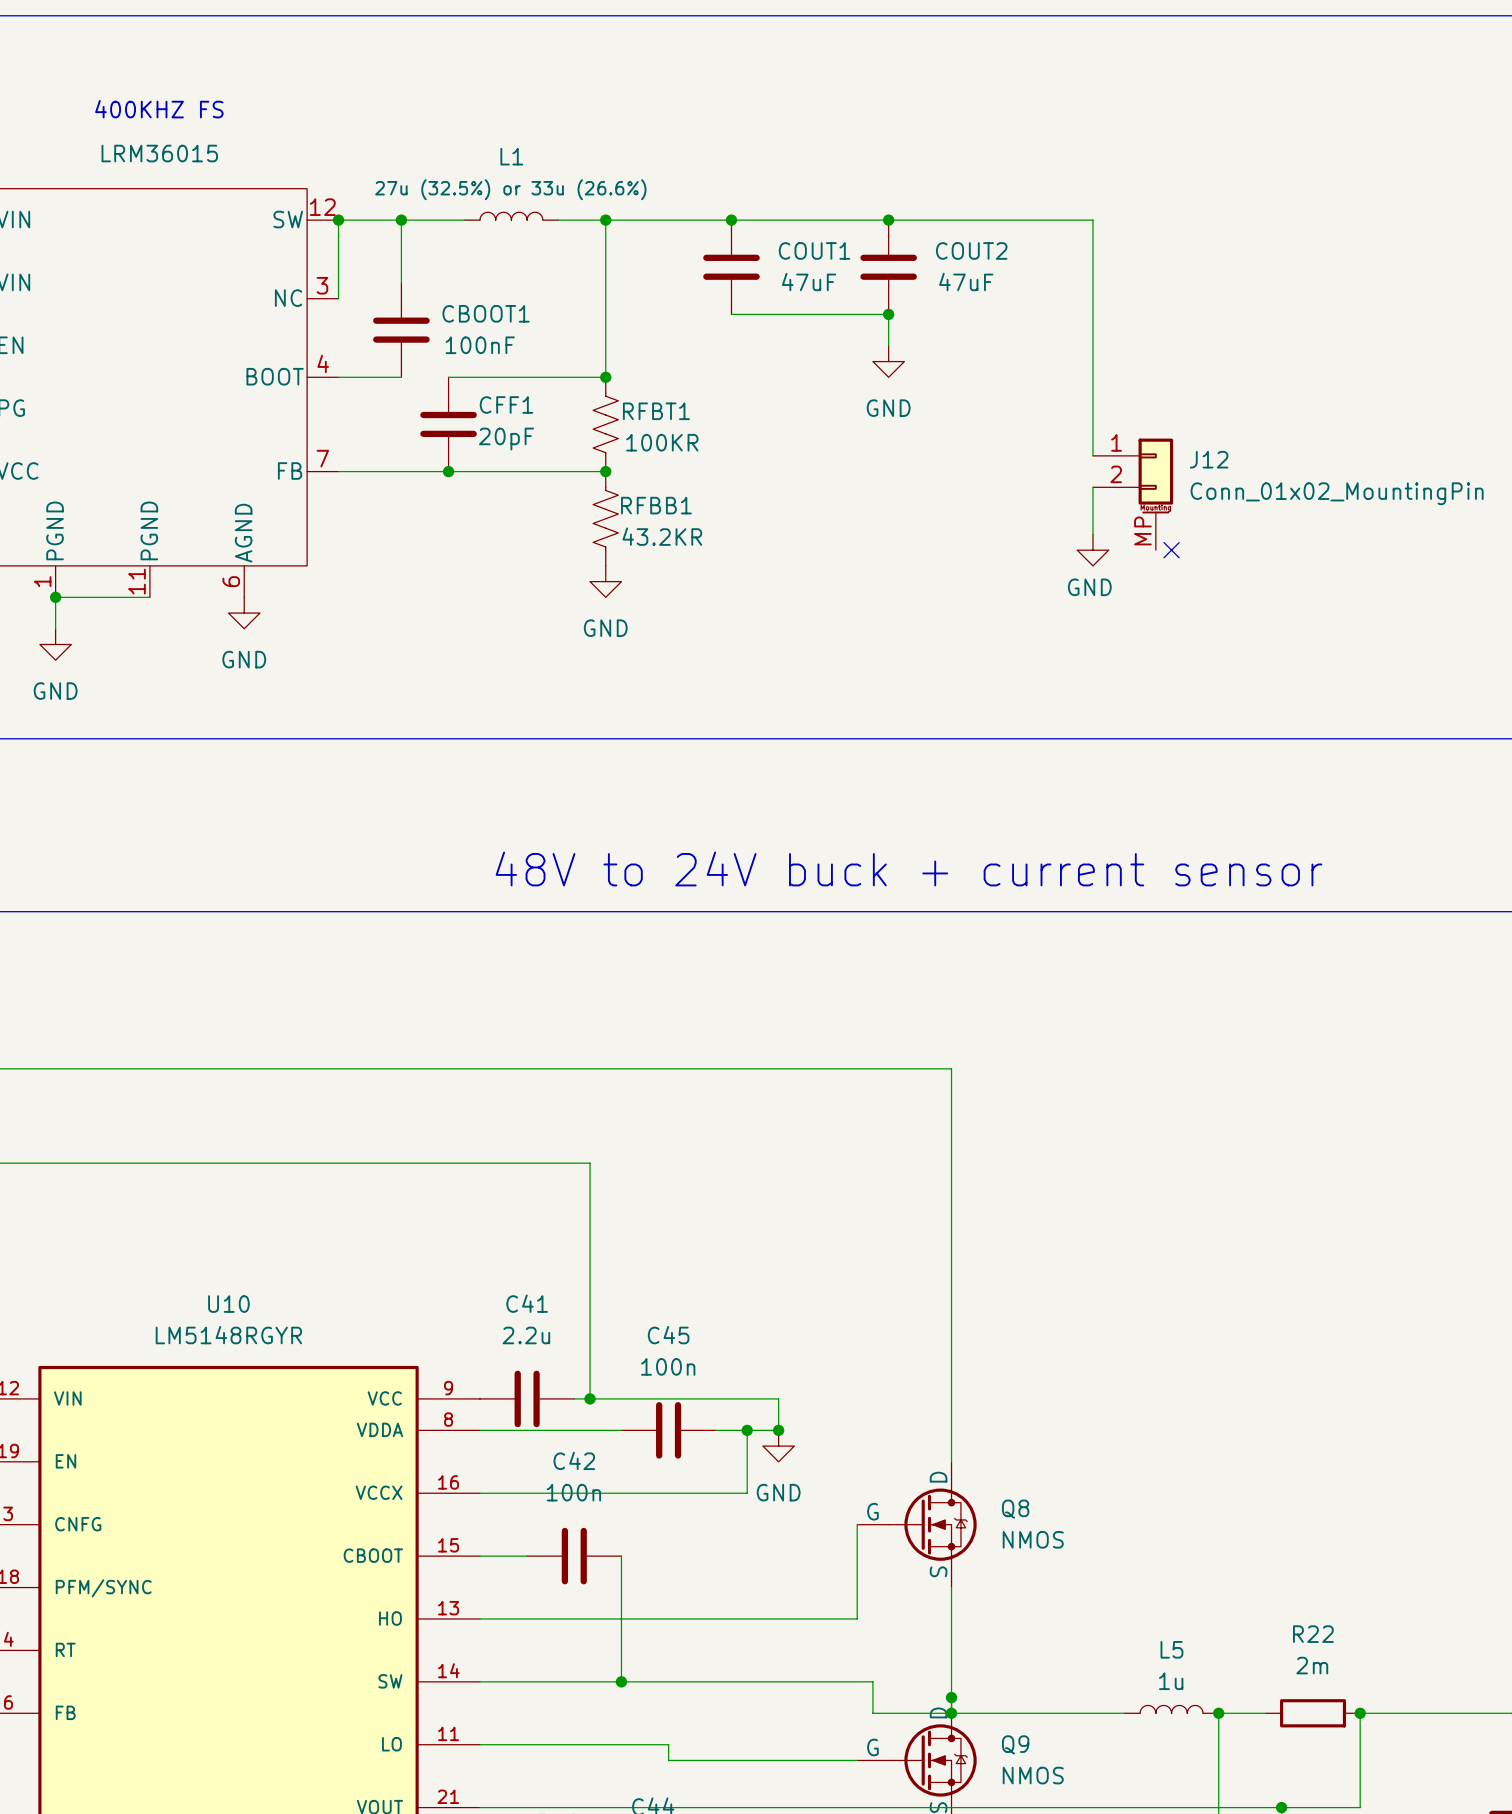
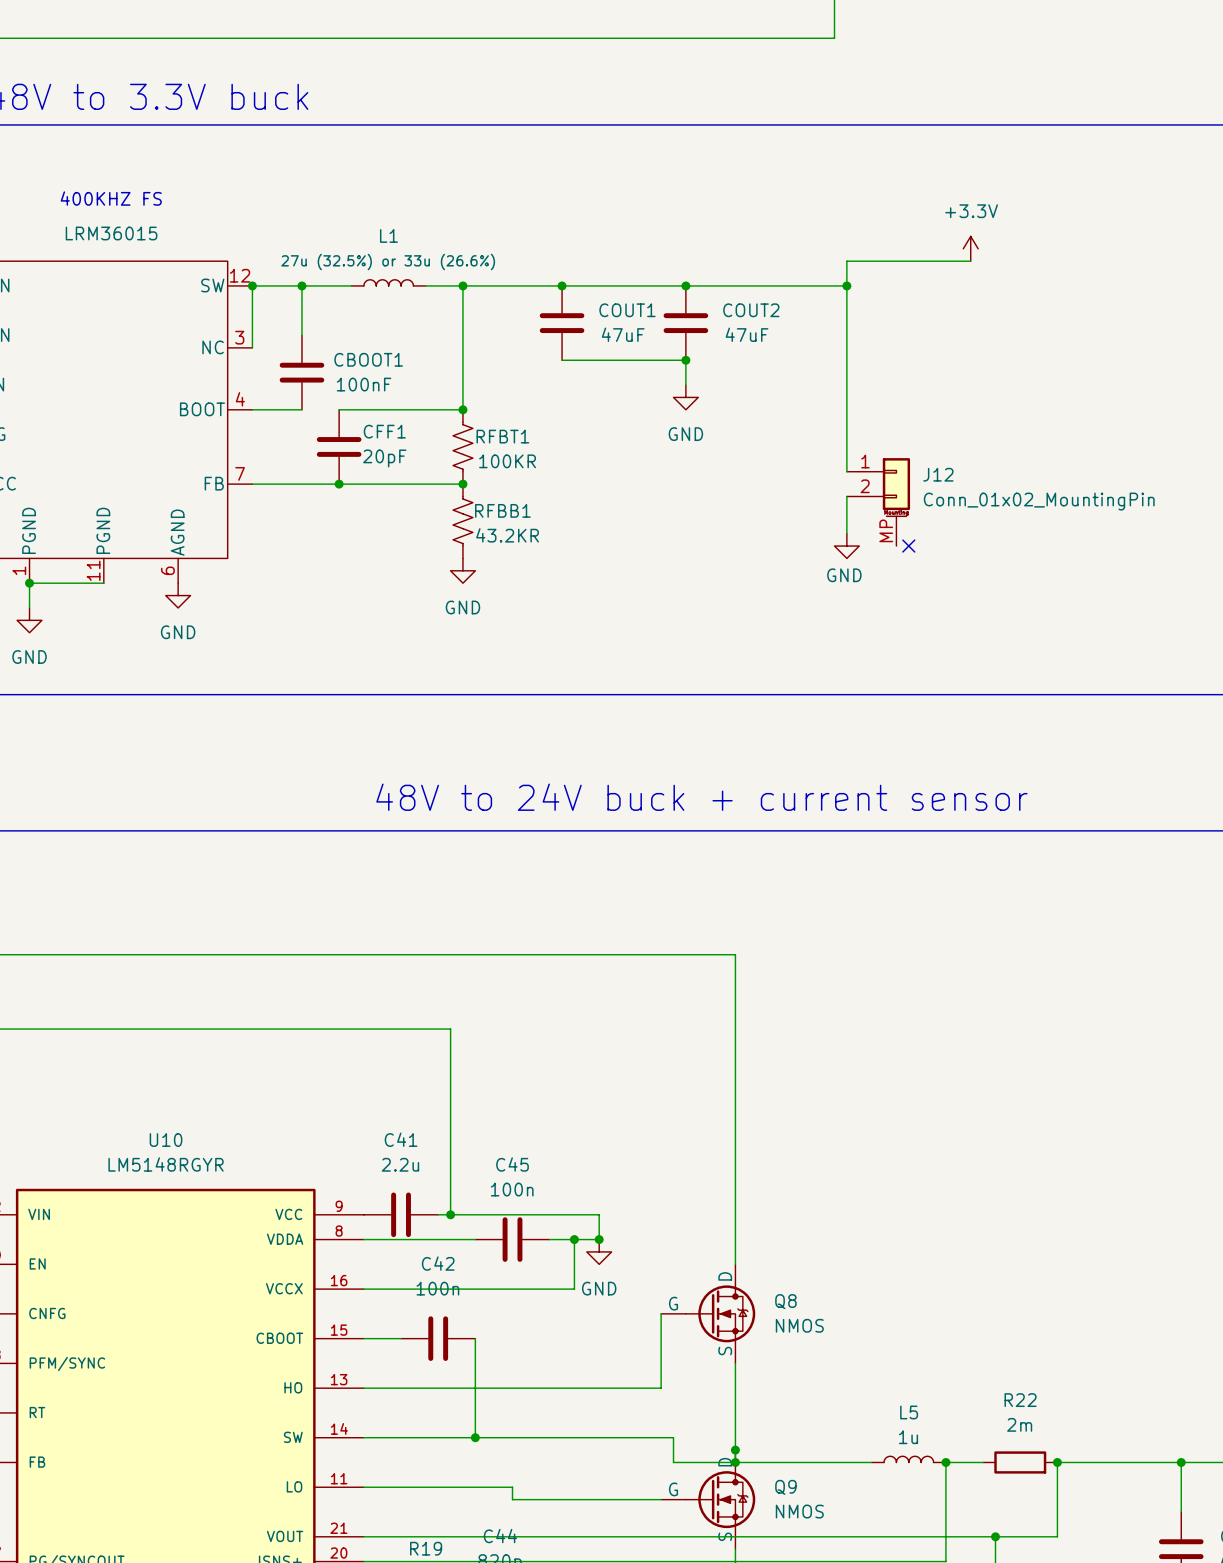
power symbol: none -> +3.3V (970, 248)
wire: none -> (970, 261) (846, 261) (846, 285)
junction: none -> (846, 285)

